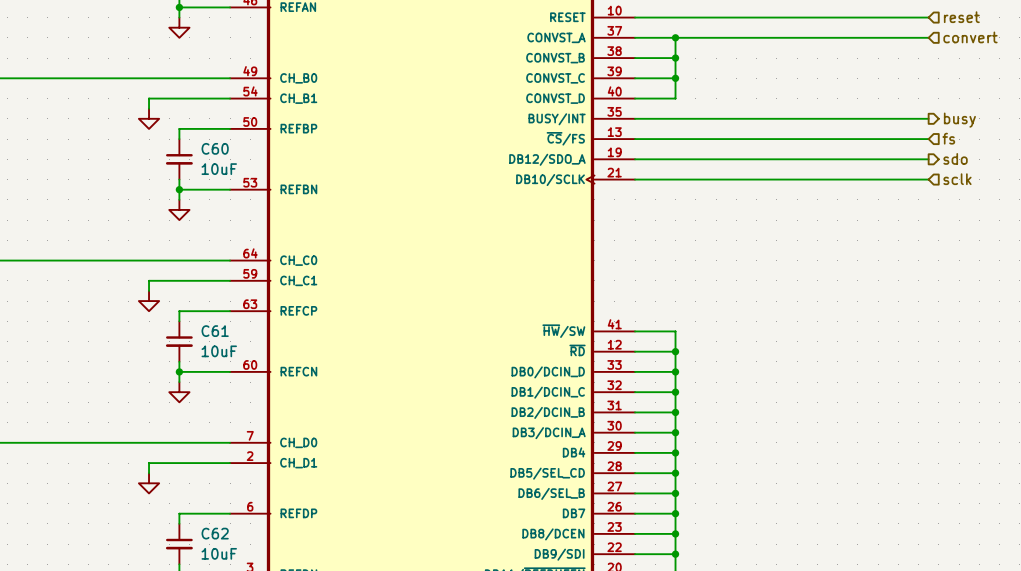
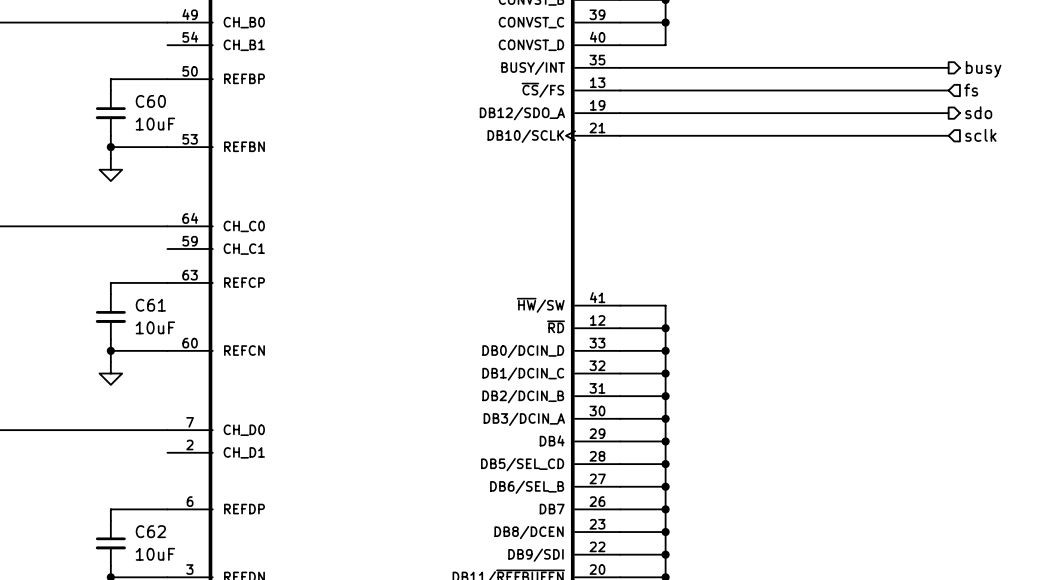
wire: (230, 98) (149, 98) (149, 108) -> none
power symbol: (149, 118) -> none
wire: (230, 280) (149, 280) (149, 290) -> none
power symbol: (149, 301) -> none
wire: (230, 463) (149, 463) (149, 473) -> none
power symbol: (149, 483) -> none

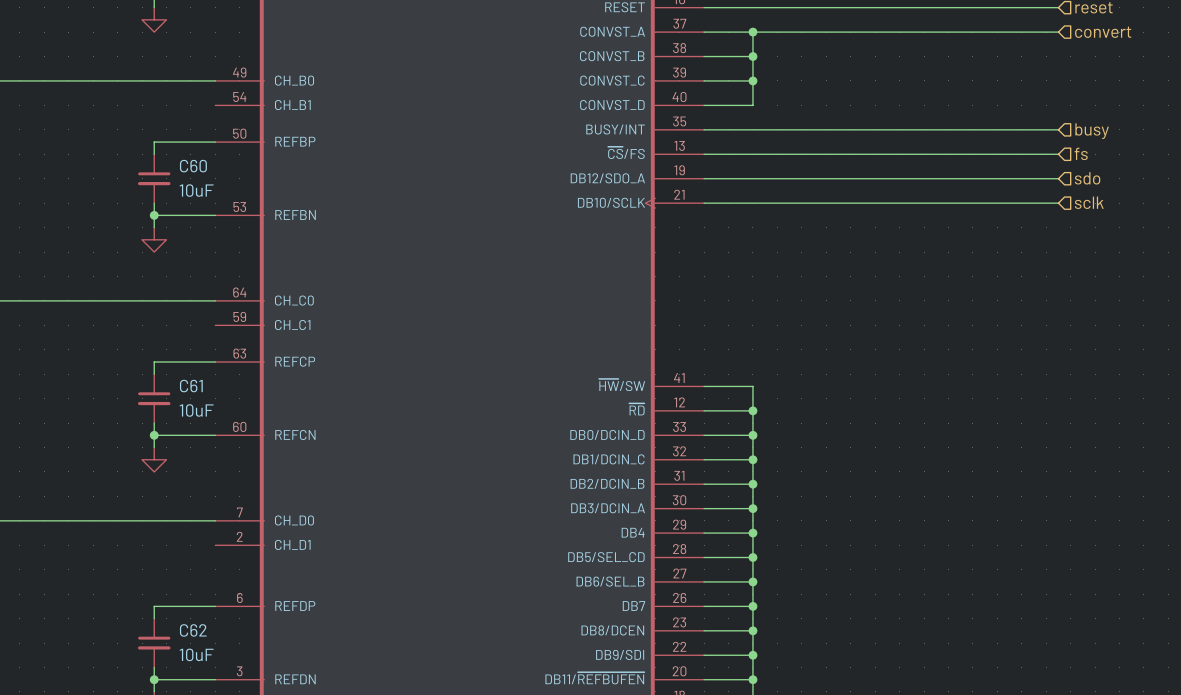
hierarchical label shape: output (983, 69) -> input (1092, 131)
hierarchical label shape: output (978, 112) -> input (1087, 178)

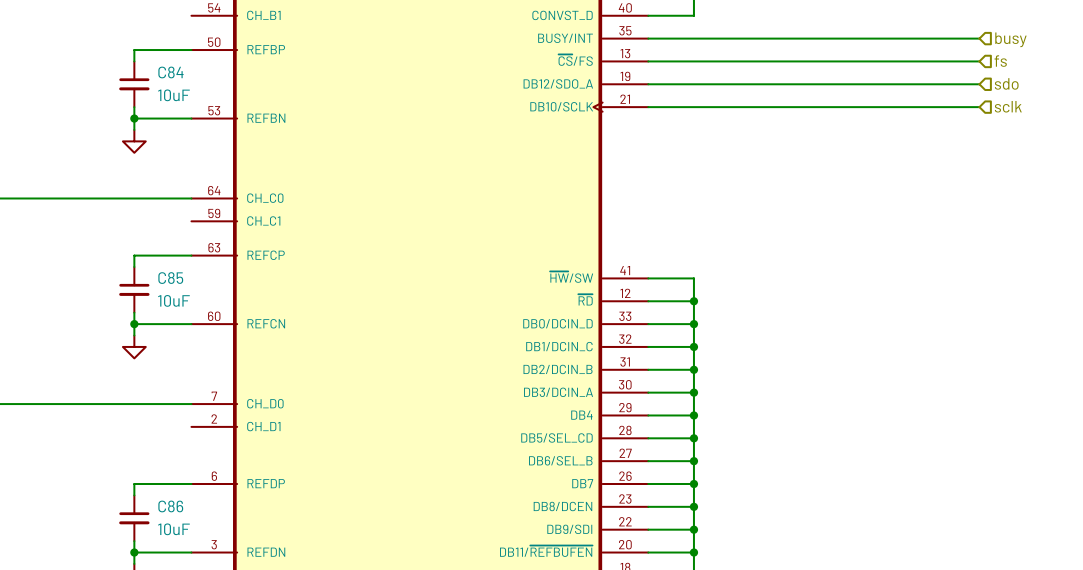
C60 name: C60 (193, 166) -> C84 (170, 72)
C61 name: C61 (191, 386) -> C85 (170, 278)
C62 name: C62 (193, 630) -> C86 (170, 506)

